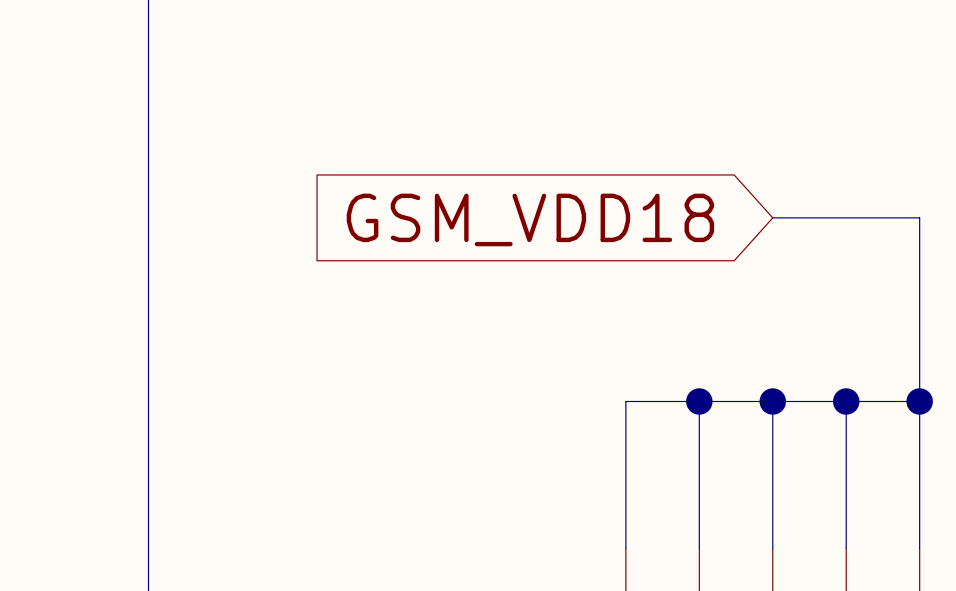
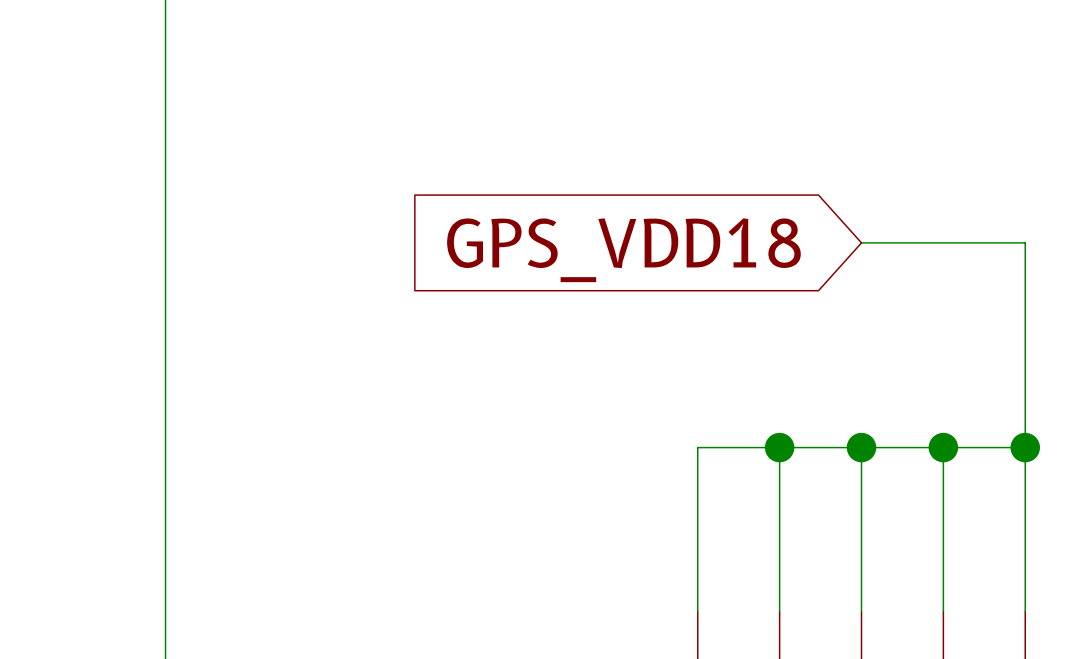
global label: GSM_VDD18 (530, 219) -> GPS_VDD18 (623, 250)

